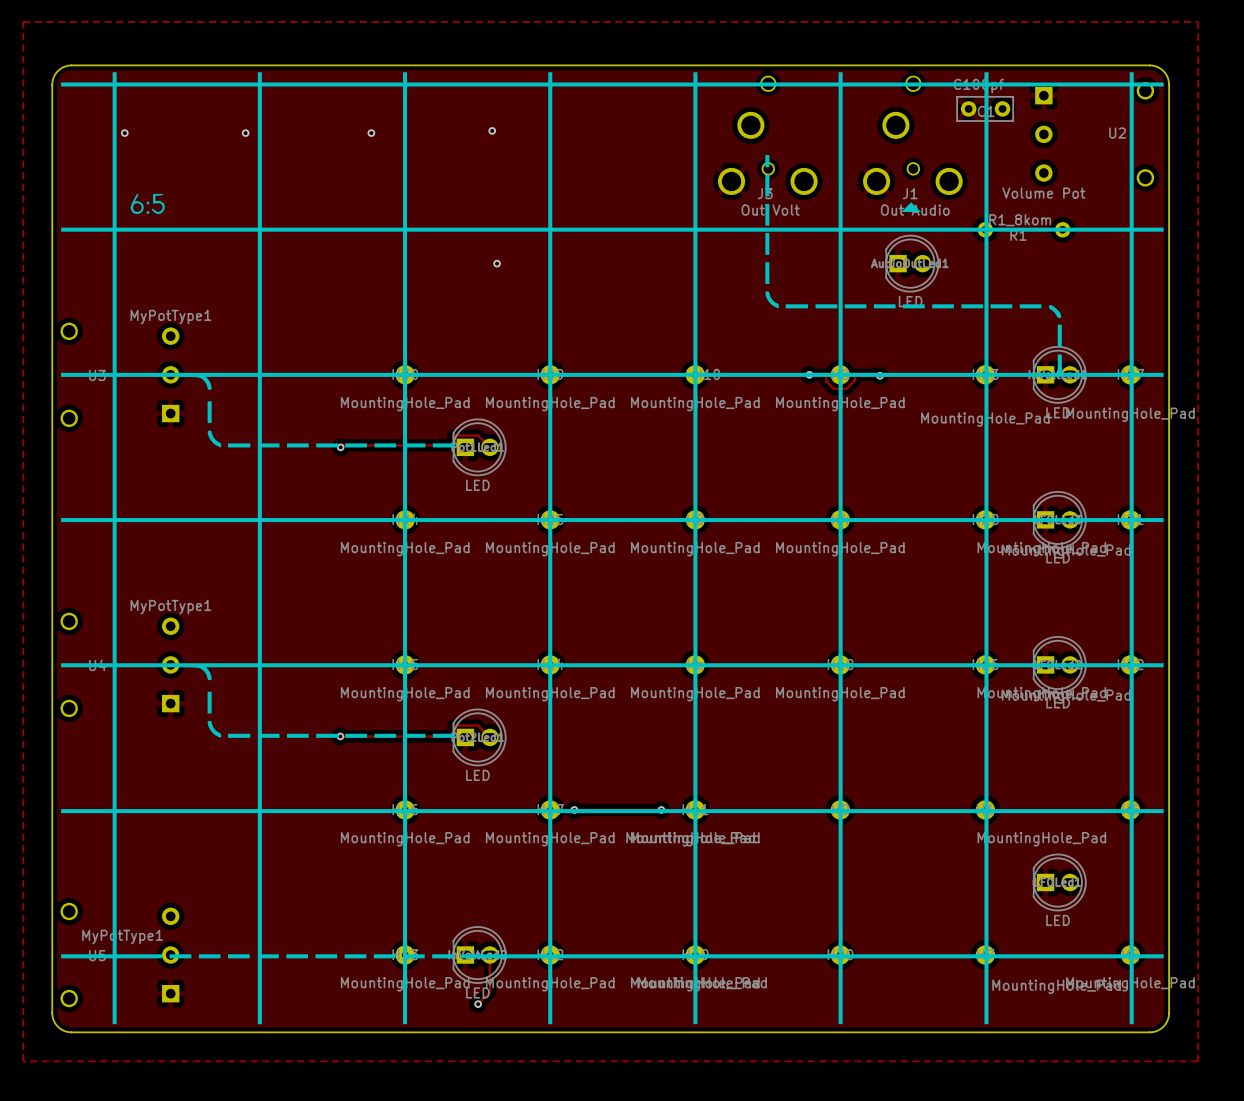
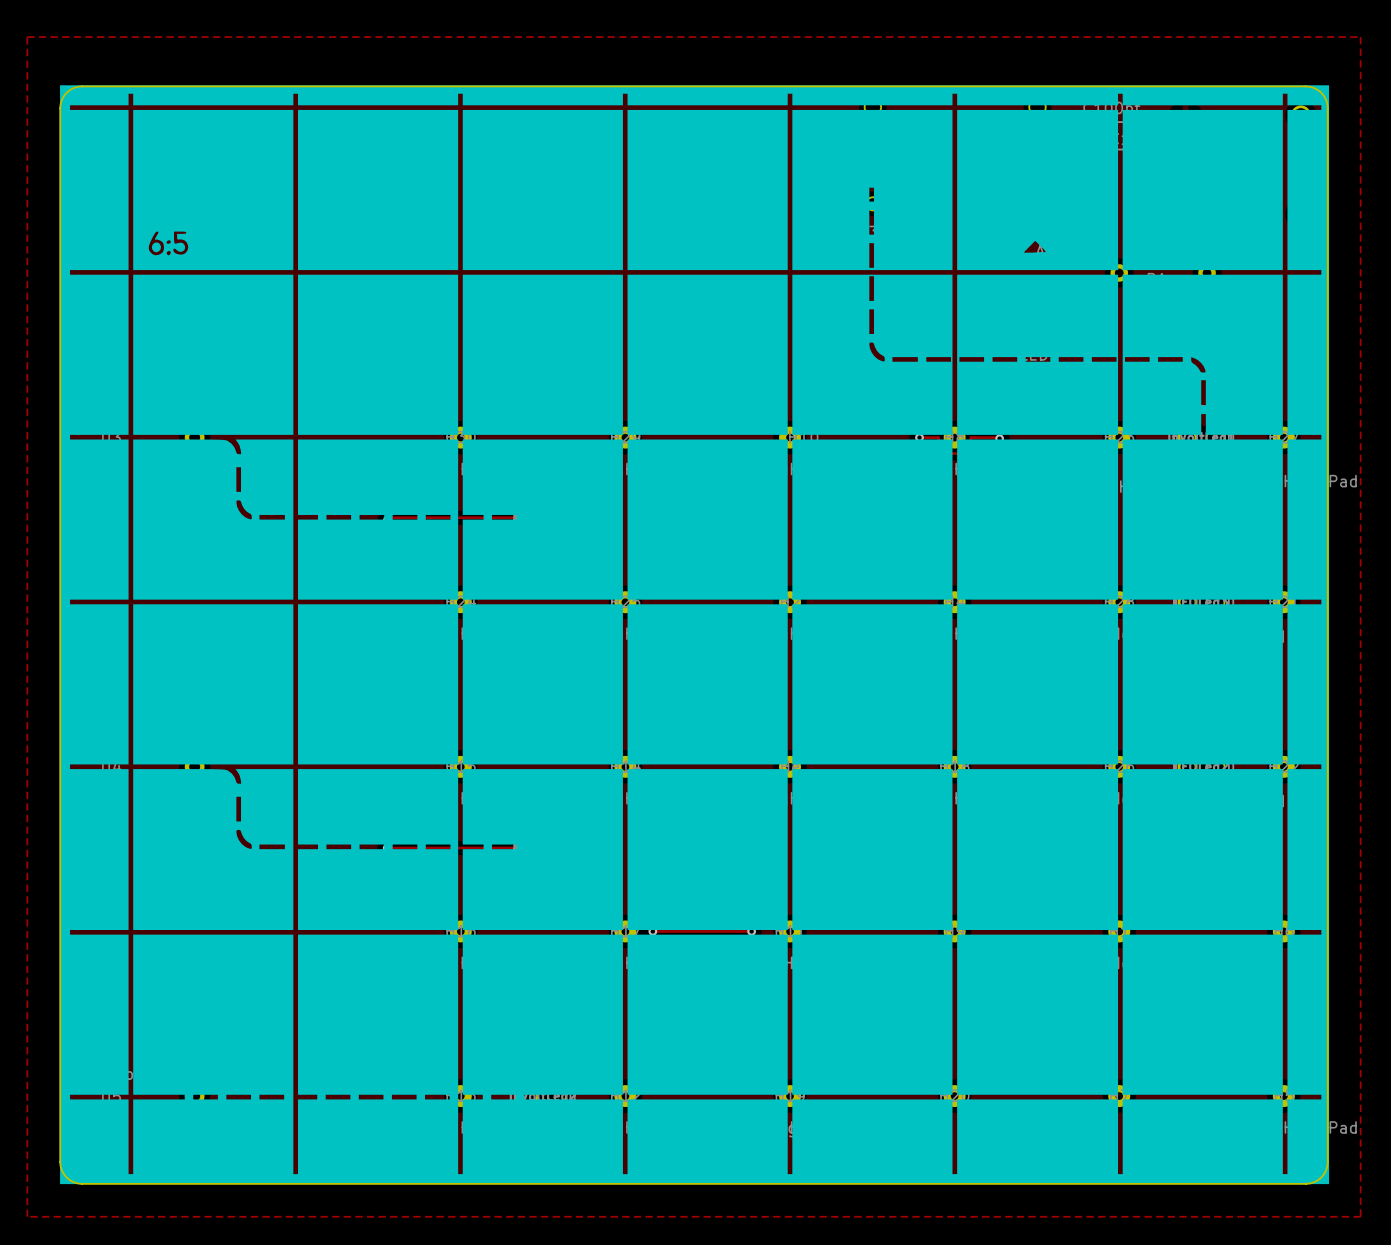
drawing: [61, 72, 1164, 1025] -> none
part: none -> (694, 634)

